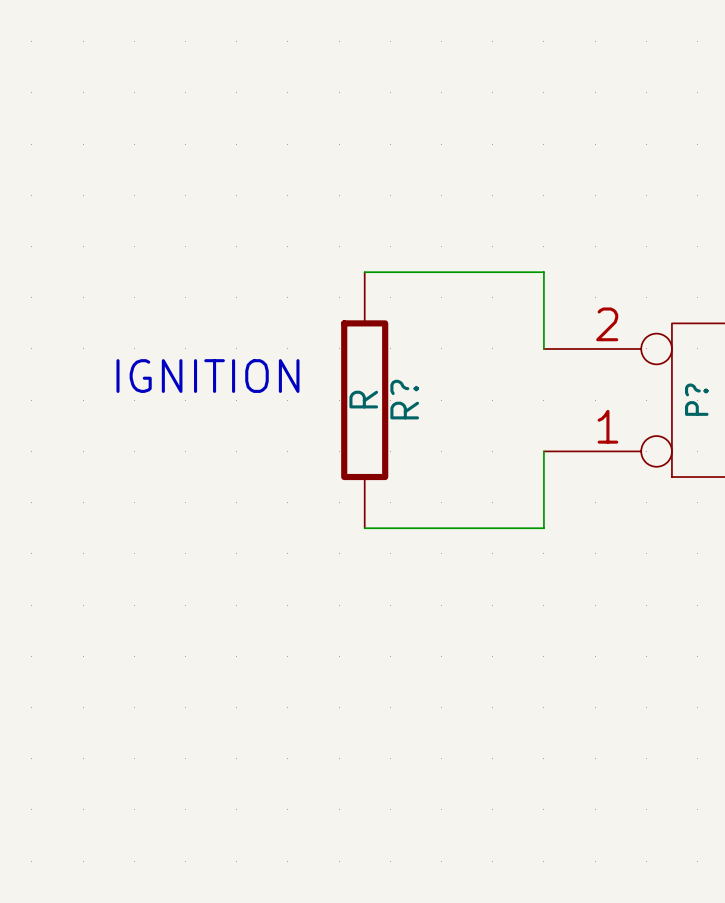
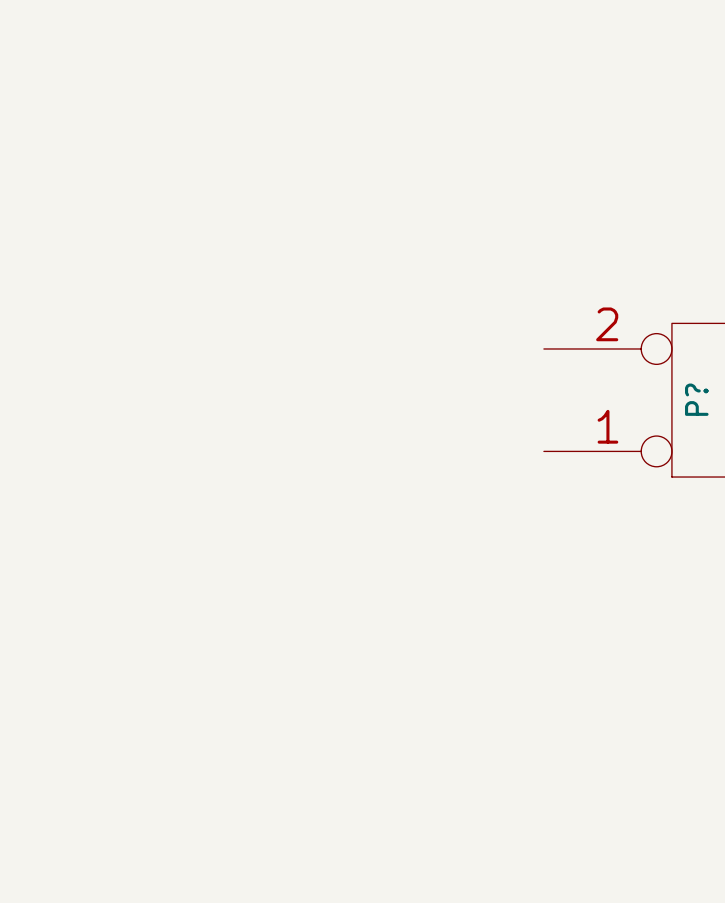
wire: (364, 272) (543, 272) (543, 348) -> none
text: IGNITION (207, 376) -> none
R?: R (364, 400) -> none
wire: (543, 451) (543, 528) (364, 528) -> none

